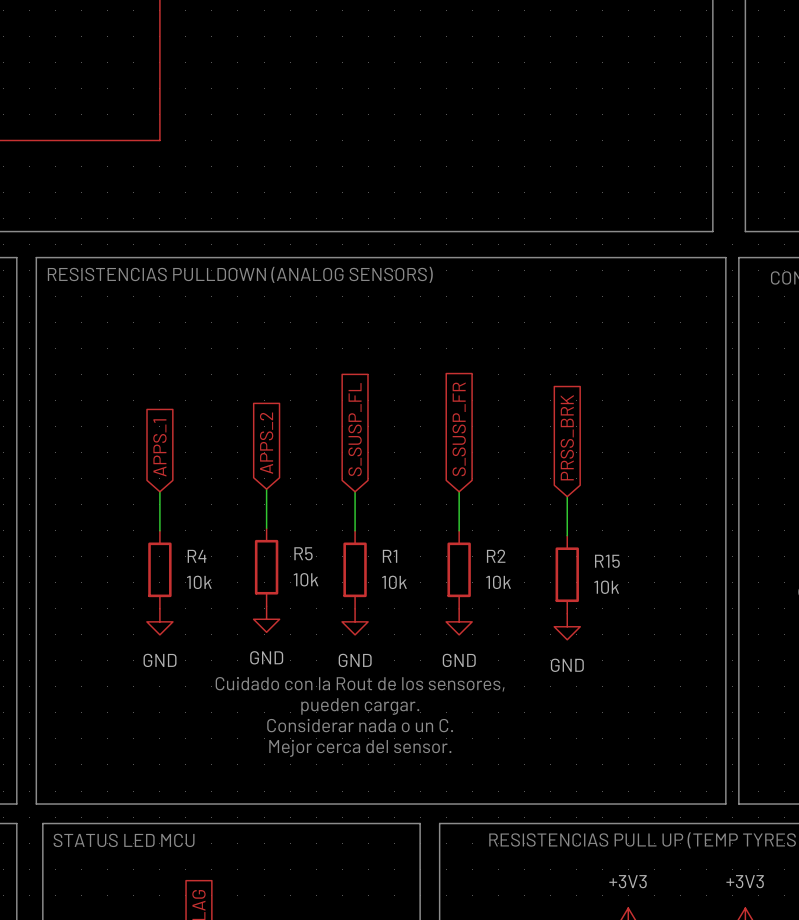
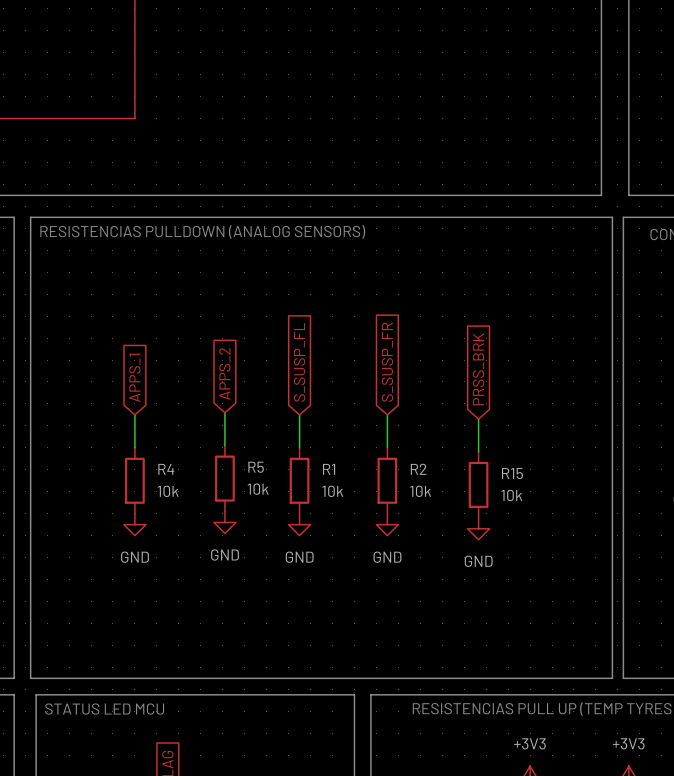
text: Cuidado con la Rout de los sensores, (360, 684) -> none
text: pueden cargar. (360, 706) -> none
text: Considerar nada o un C. (360, 725) -> none
text: Mejor cerca del sensor. (360, 748) -> none

